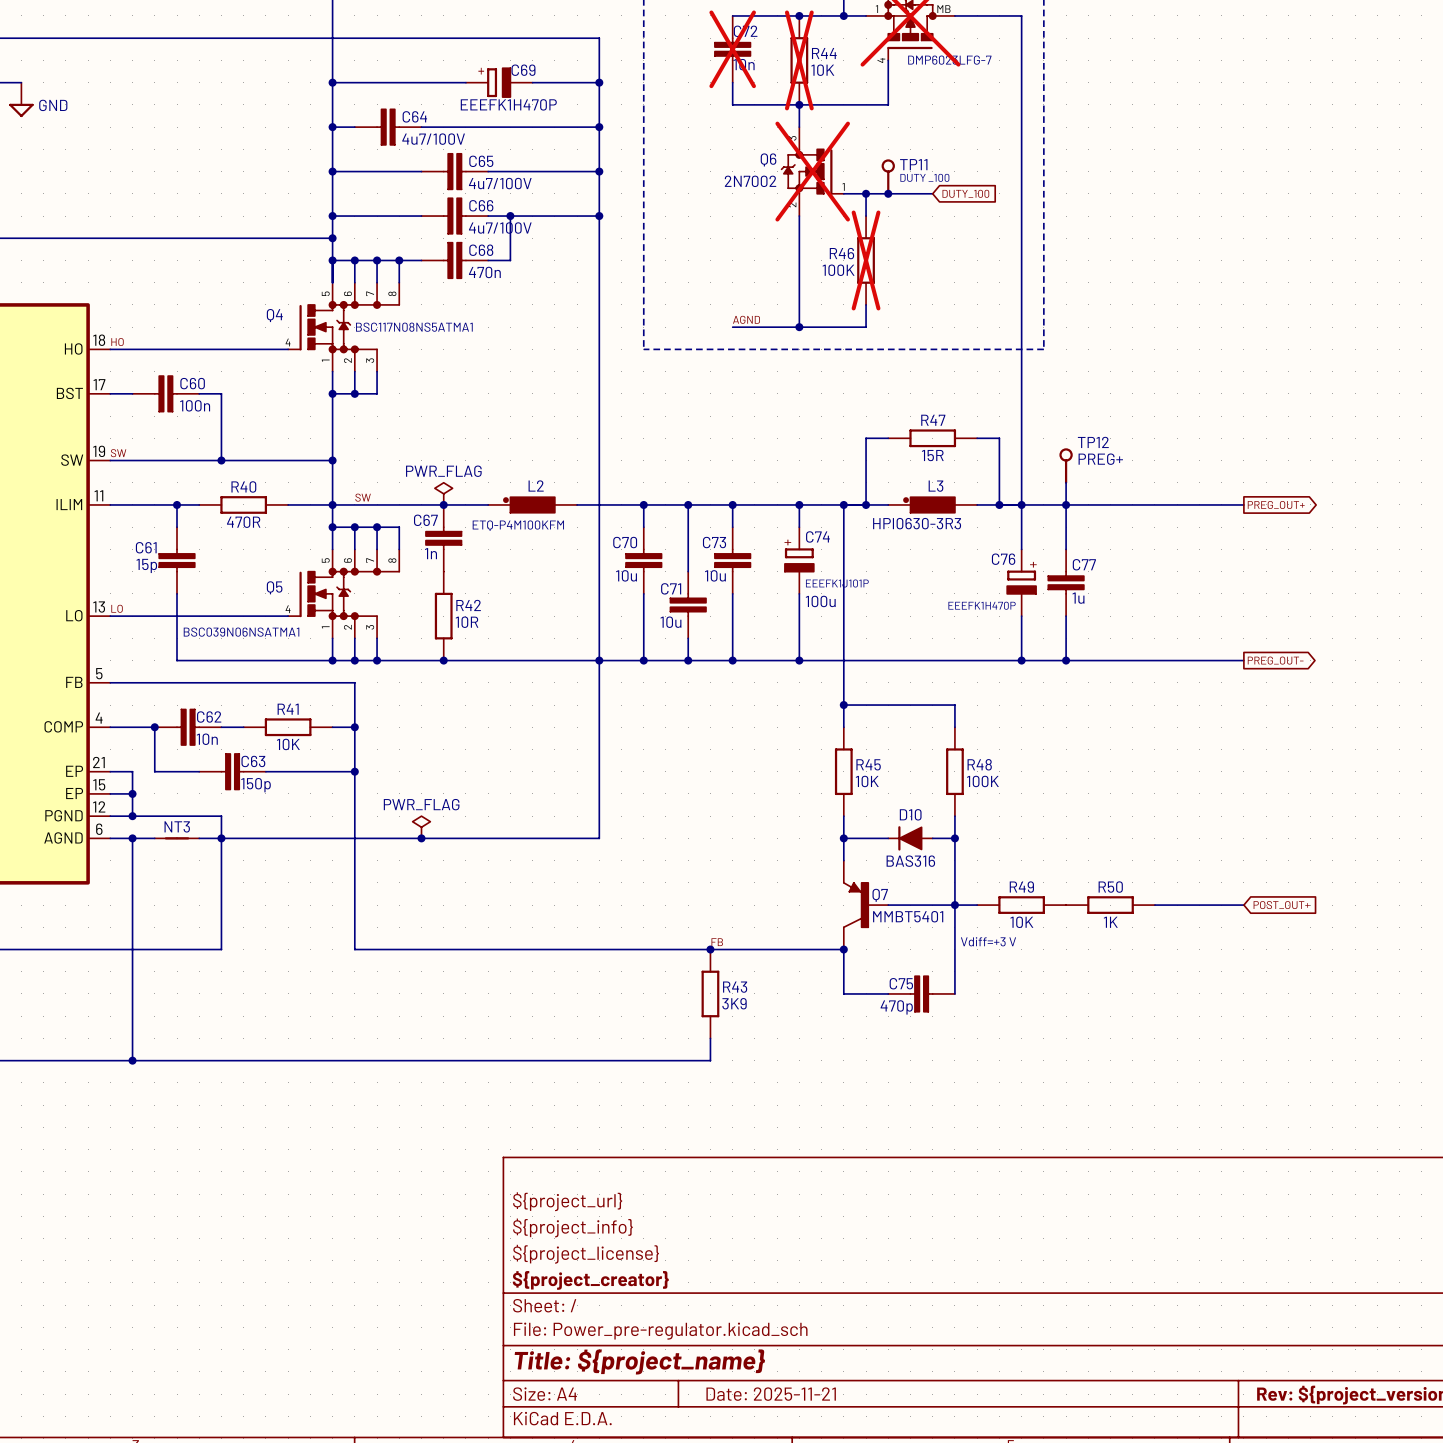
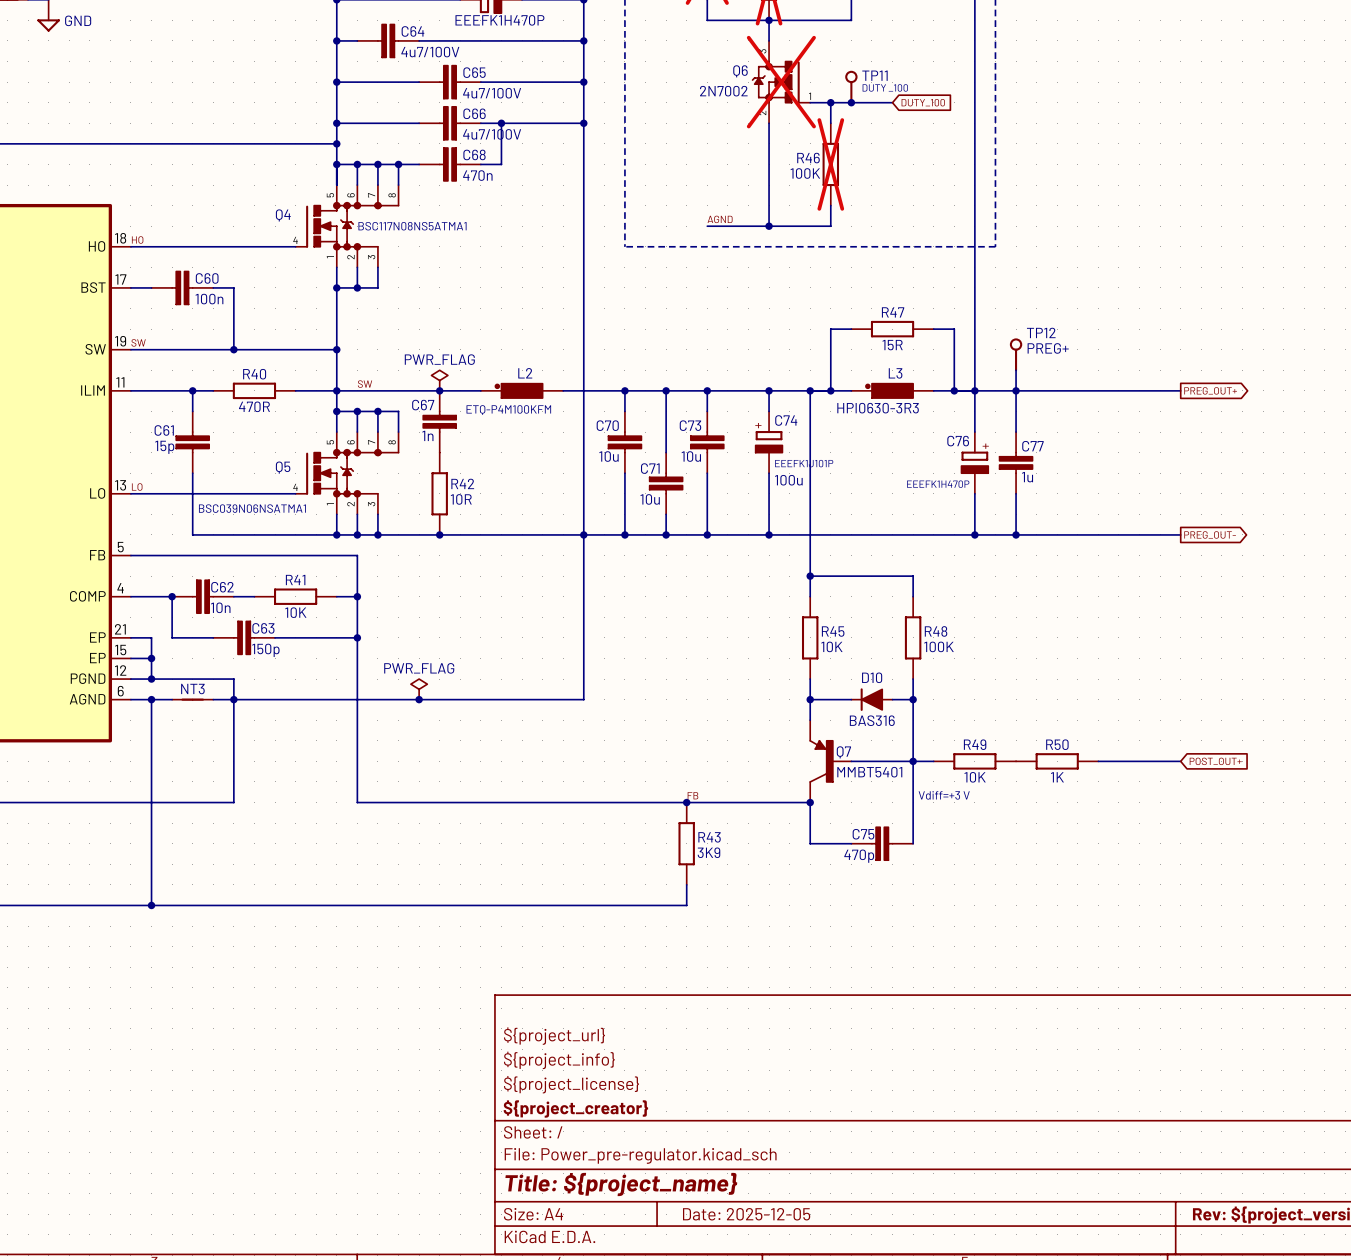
title block: Date: 2025-11-21 (771, 1394) -> Date: 2025-12-05 (746, 1214)

